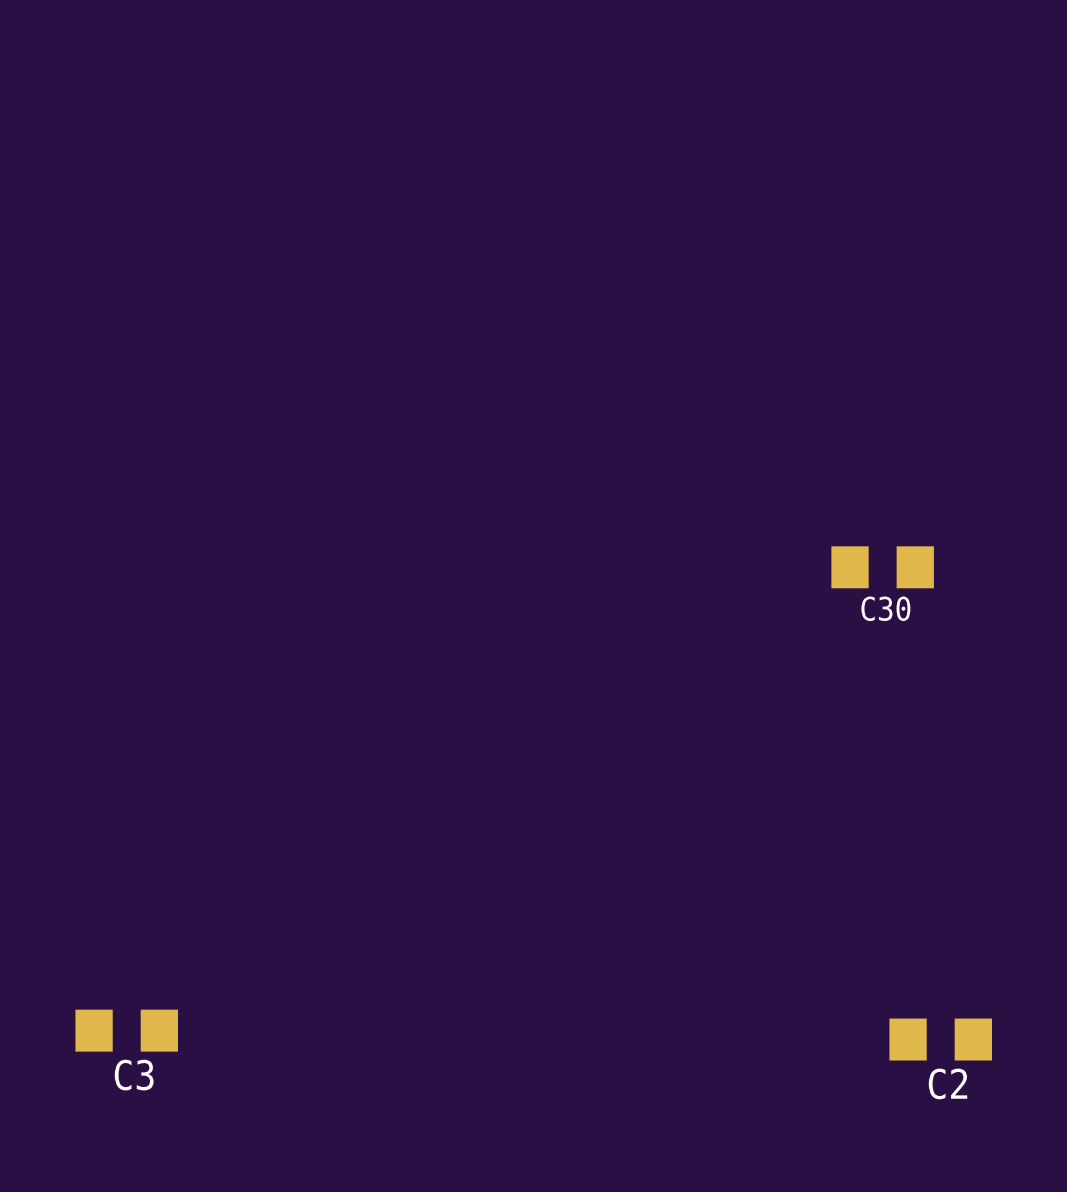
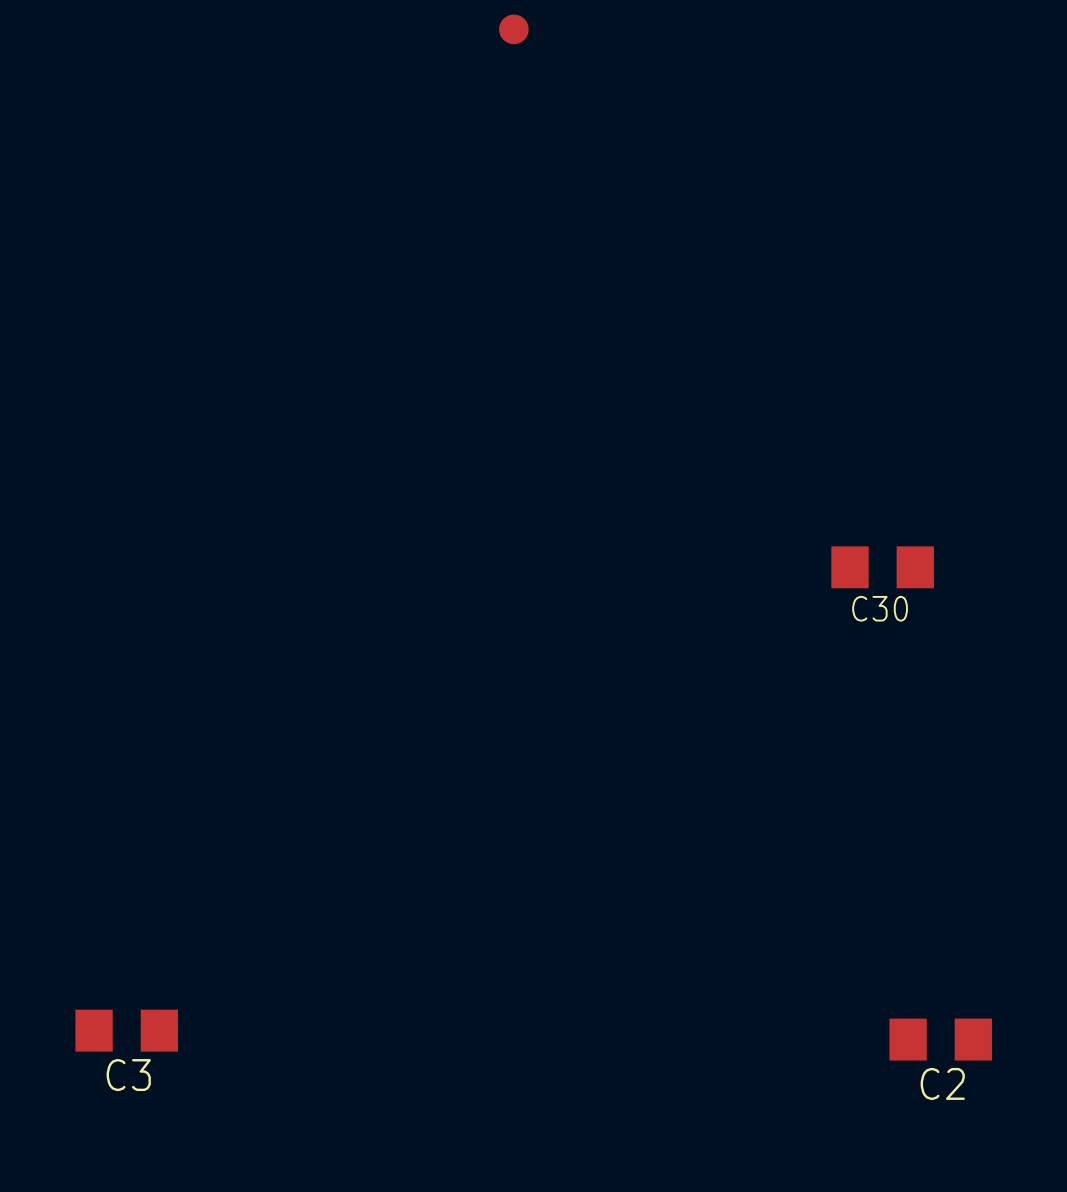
part: none -> (513, 29)

